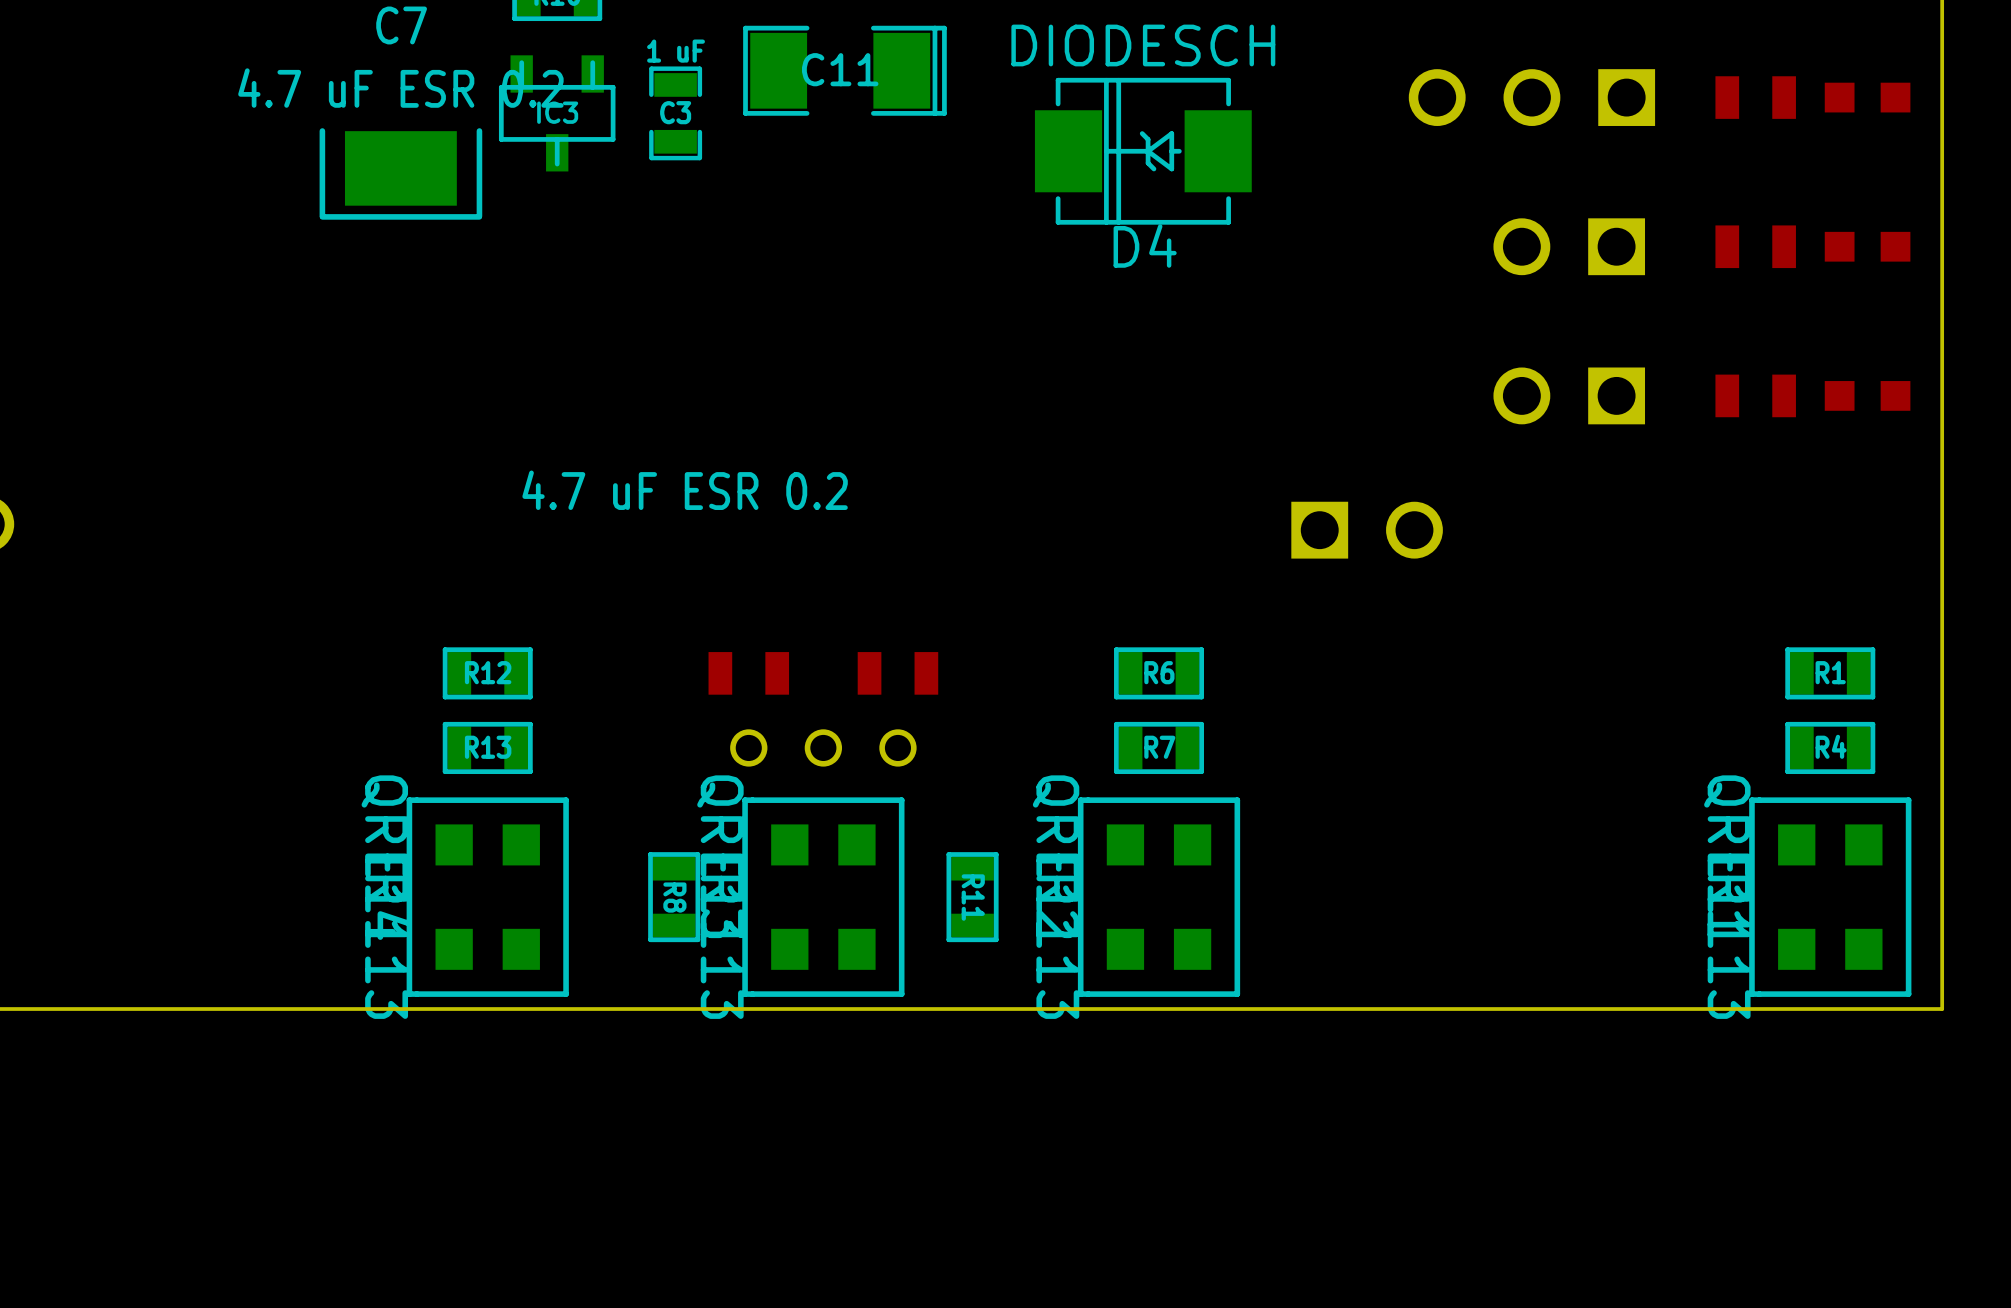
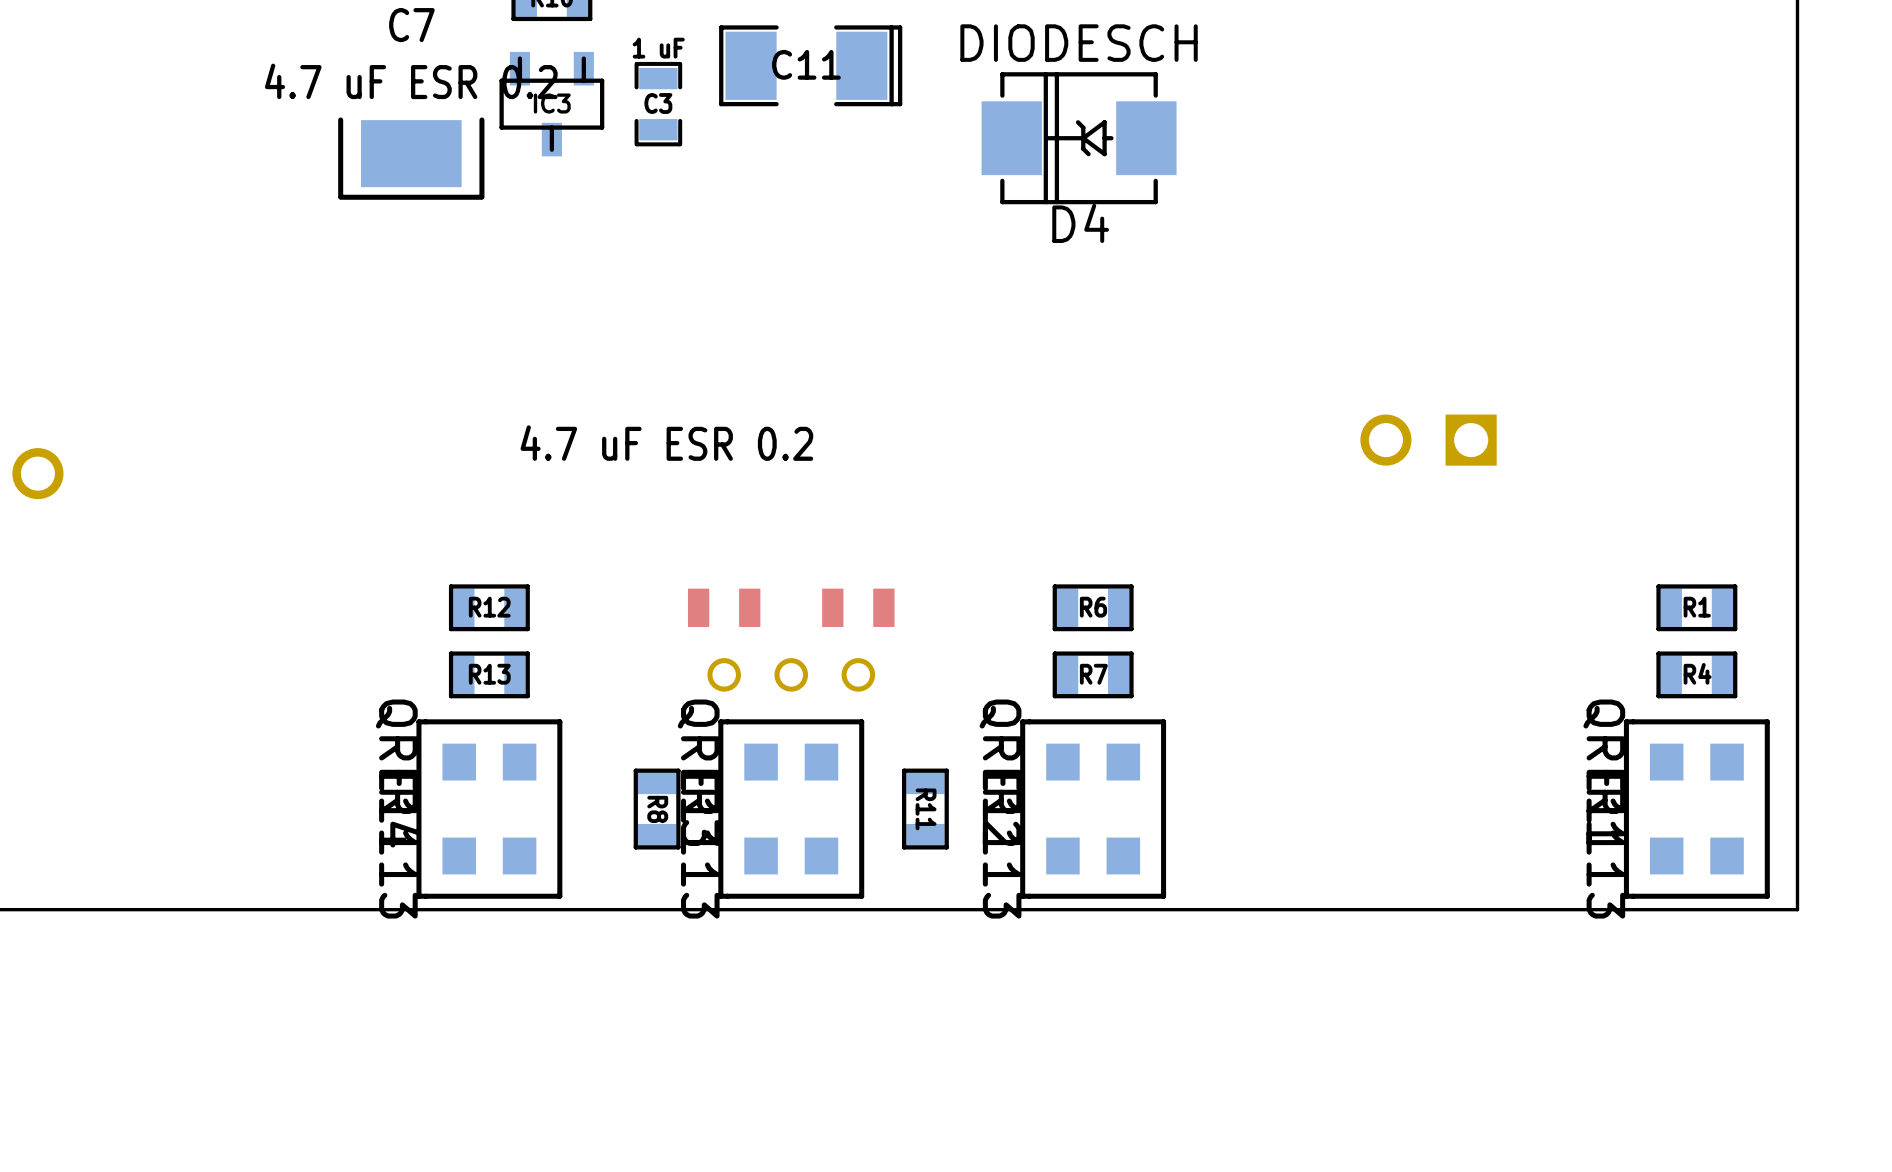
part: (1531, 97) -> none
part: (1755, 97) -> none
part: (1867, 97) -> none
part: (1569, 246) -> none
part: (1755, 246) -> none
part: (1867, 246) -> none
part: (1569, 395) -> none
part: (1755, 395) -> none
part: (1867, 395) -> none
part: none -> (1428, 440)
part: (1367, 530) -> none

